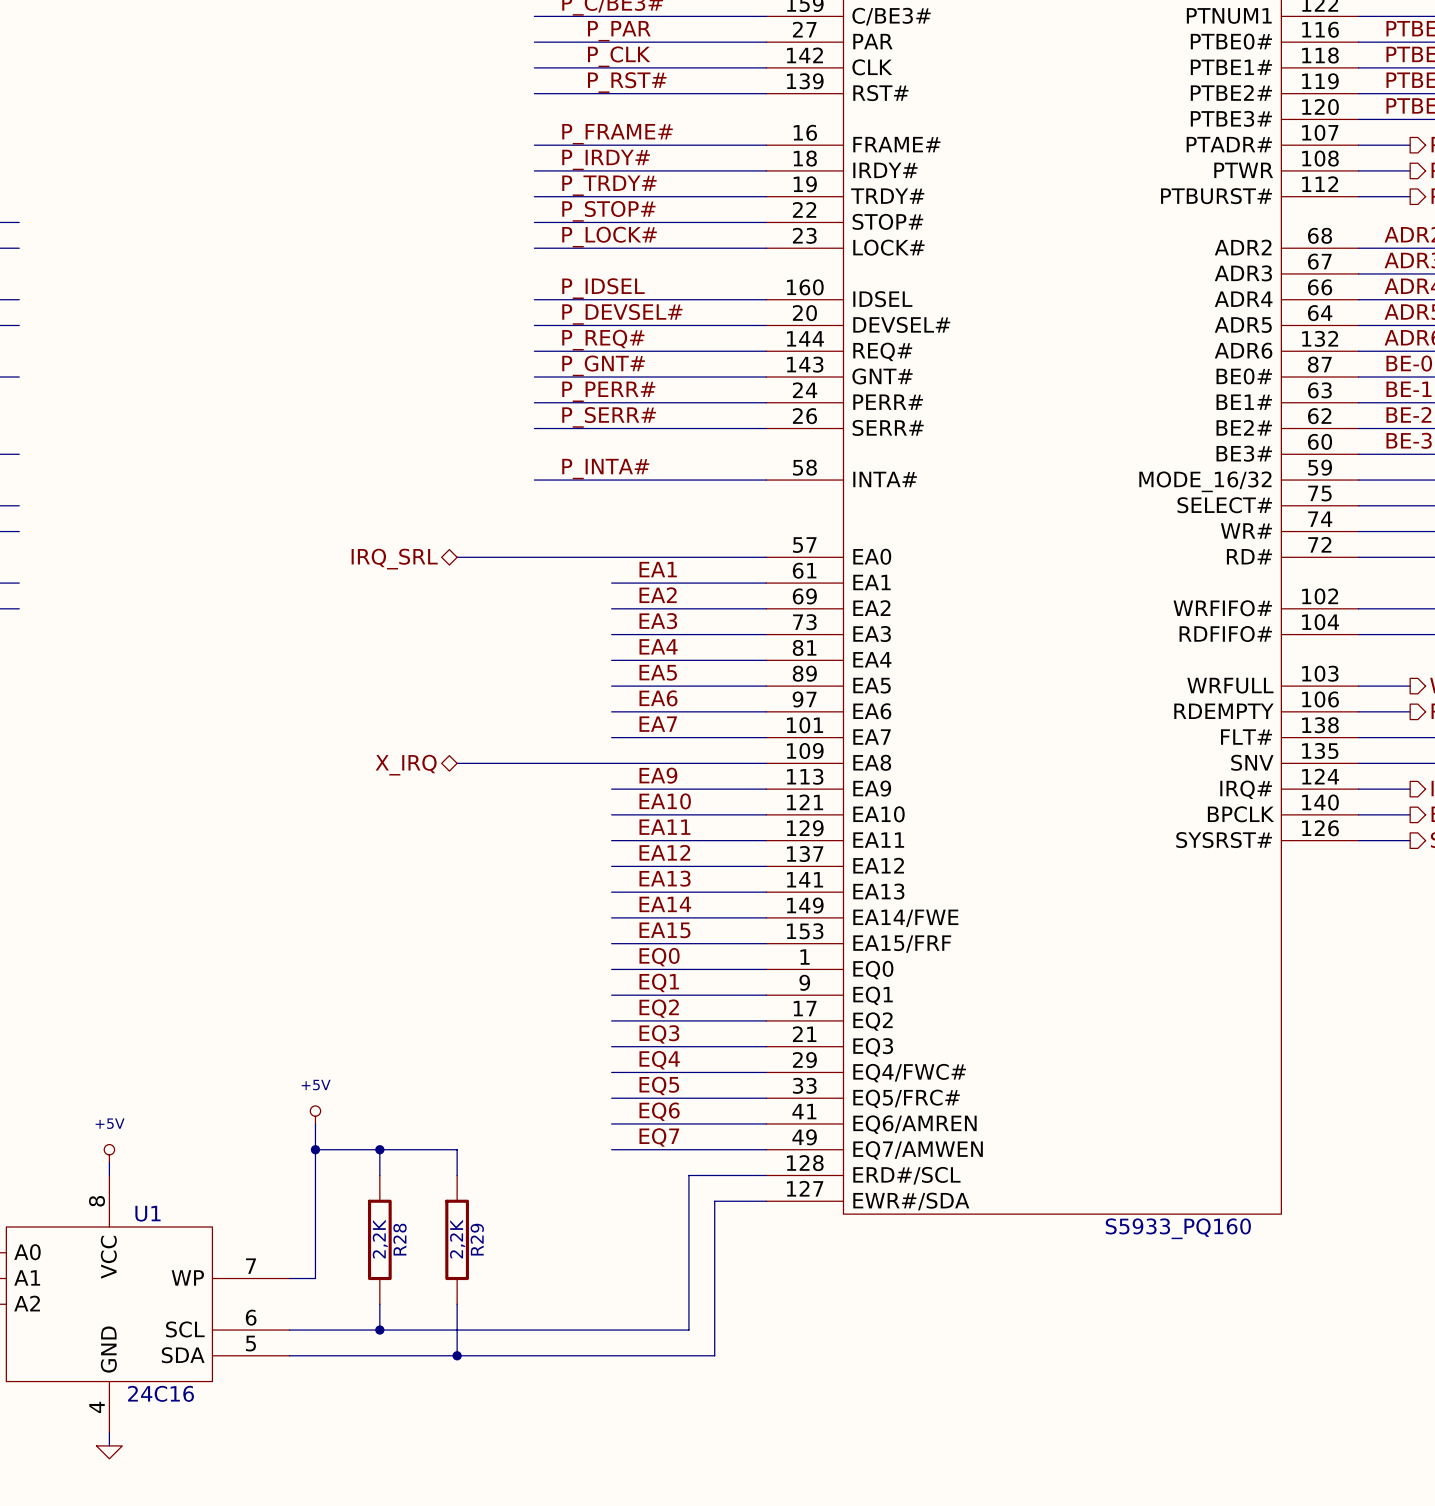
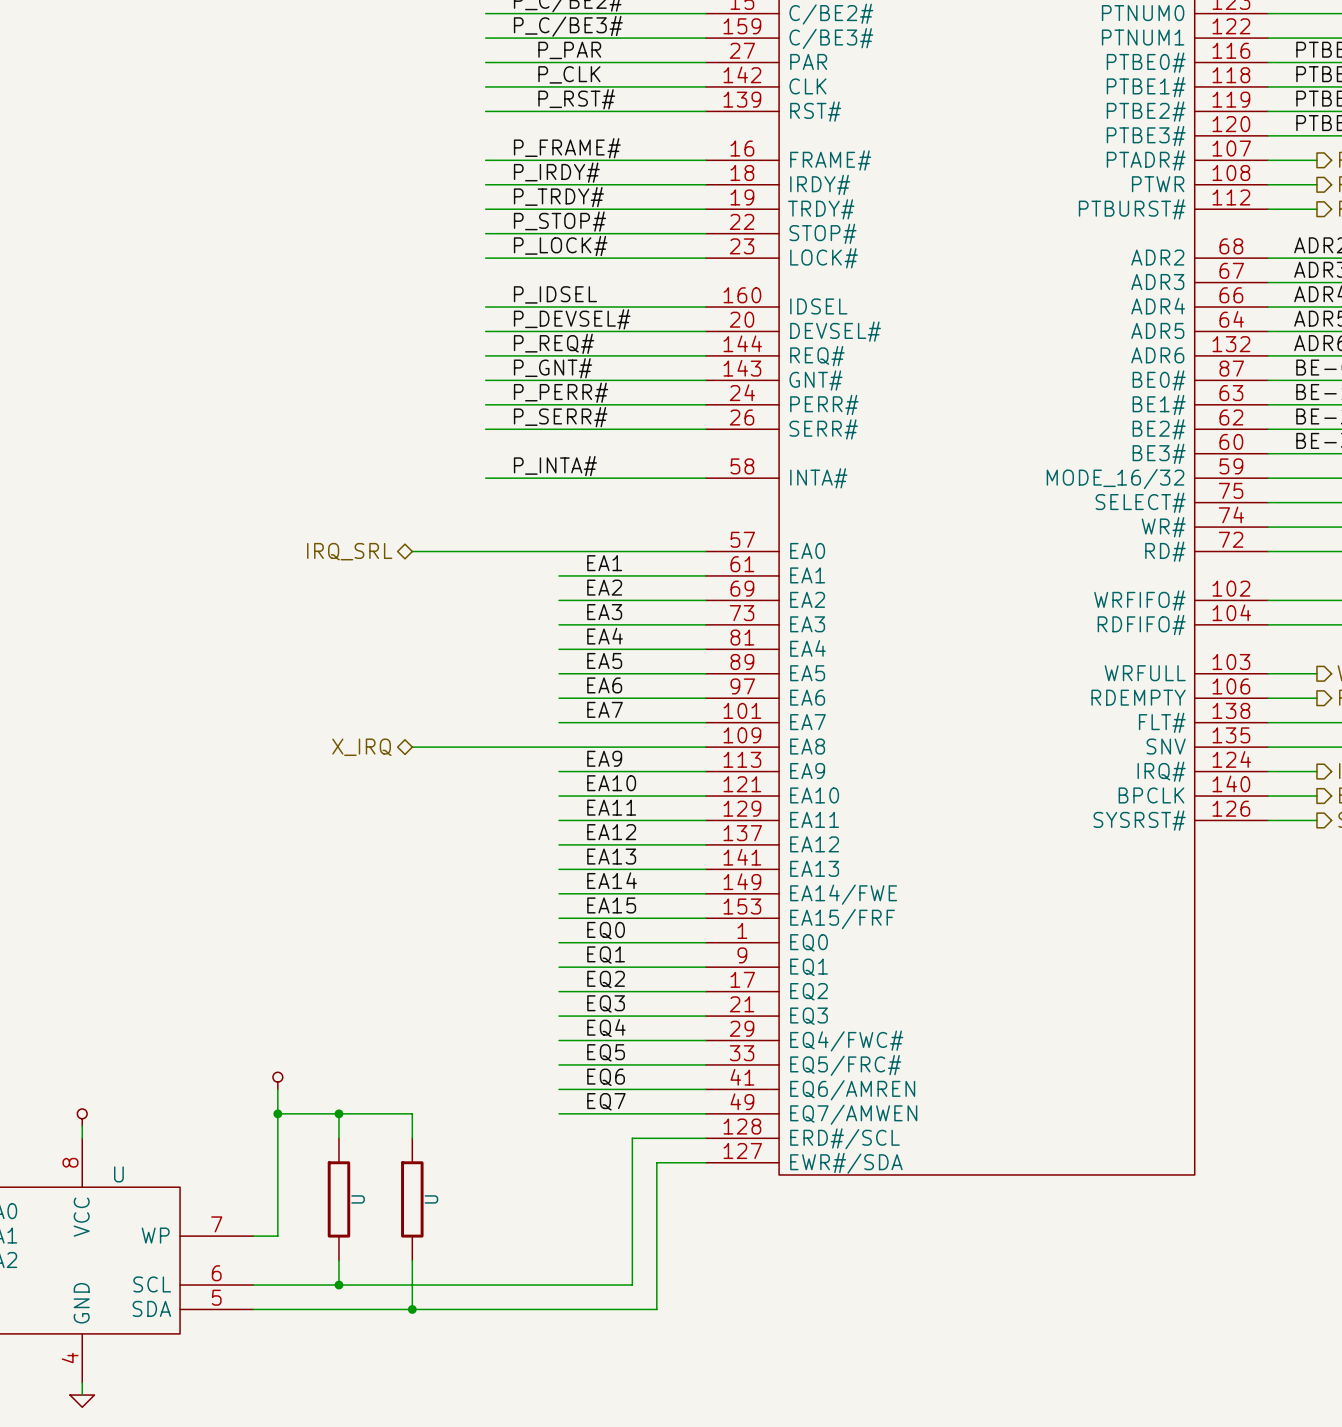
power symbol text: +5V (316, 1085) -> none
power symbol text: +5V (110, 1123) -> none
U1 name: U1 (147, 1213) -> U (118, 1174)
part value: S5933_PQ160 (1178, 1228) -> none
R28 value: 2,2K (380, 1239) -> none
R28 name: R28 (399, 1239) -> U (358, 1199)
R29 value: 2,2K (457, 1239) -> none
R29 name: R29 (477, 1239) -> U (431, 1199)
U1 value: 24C16 (161, 1393) -> none

